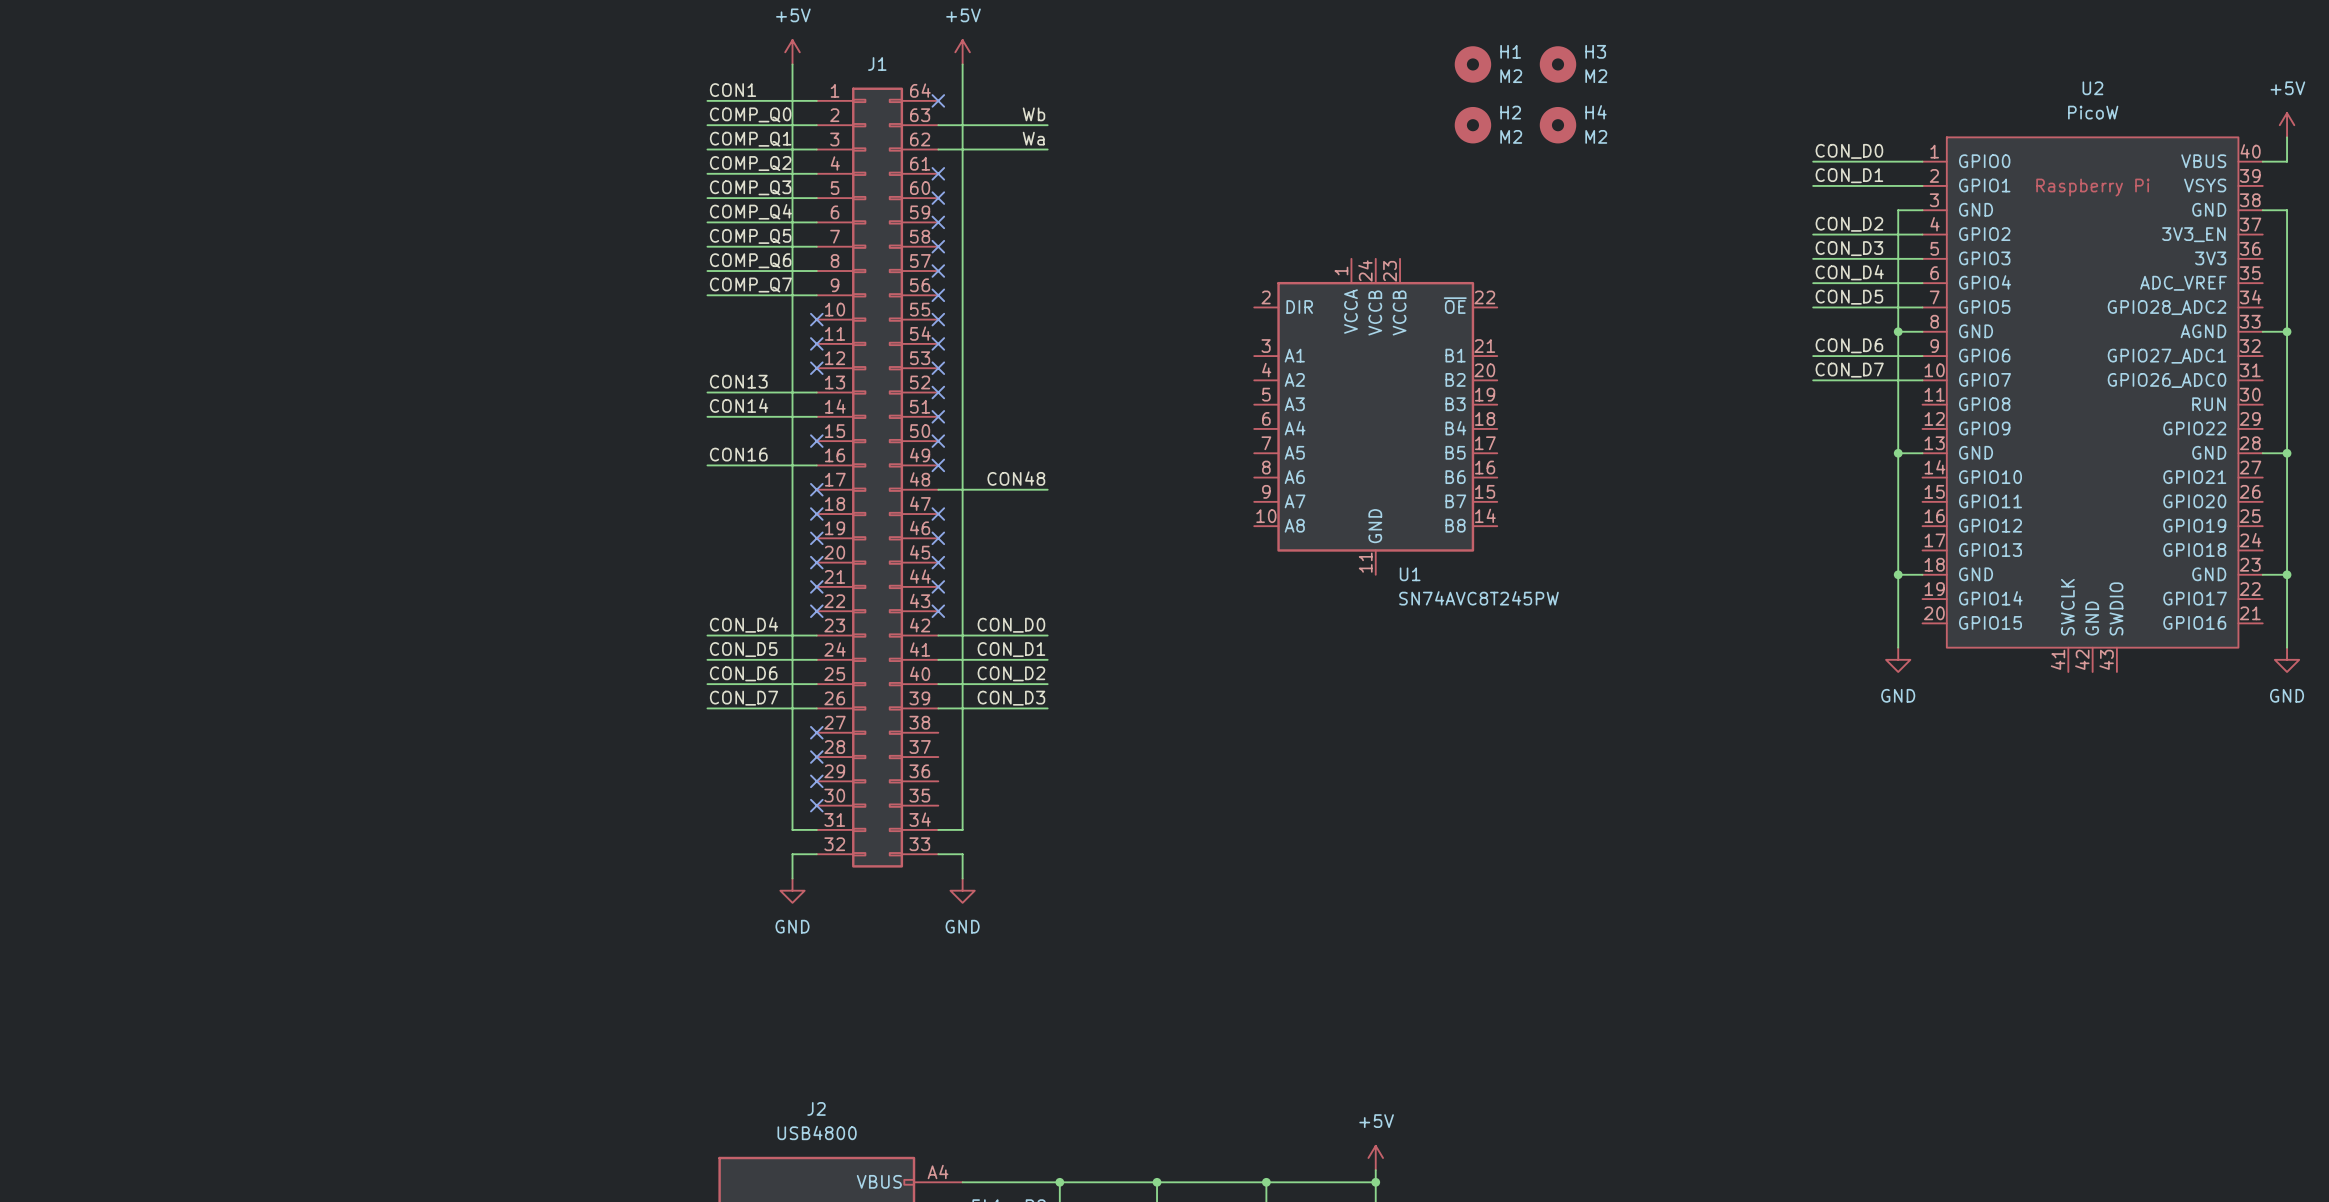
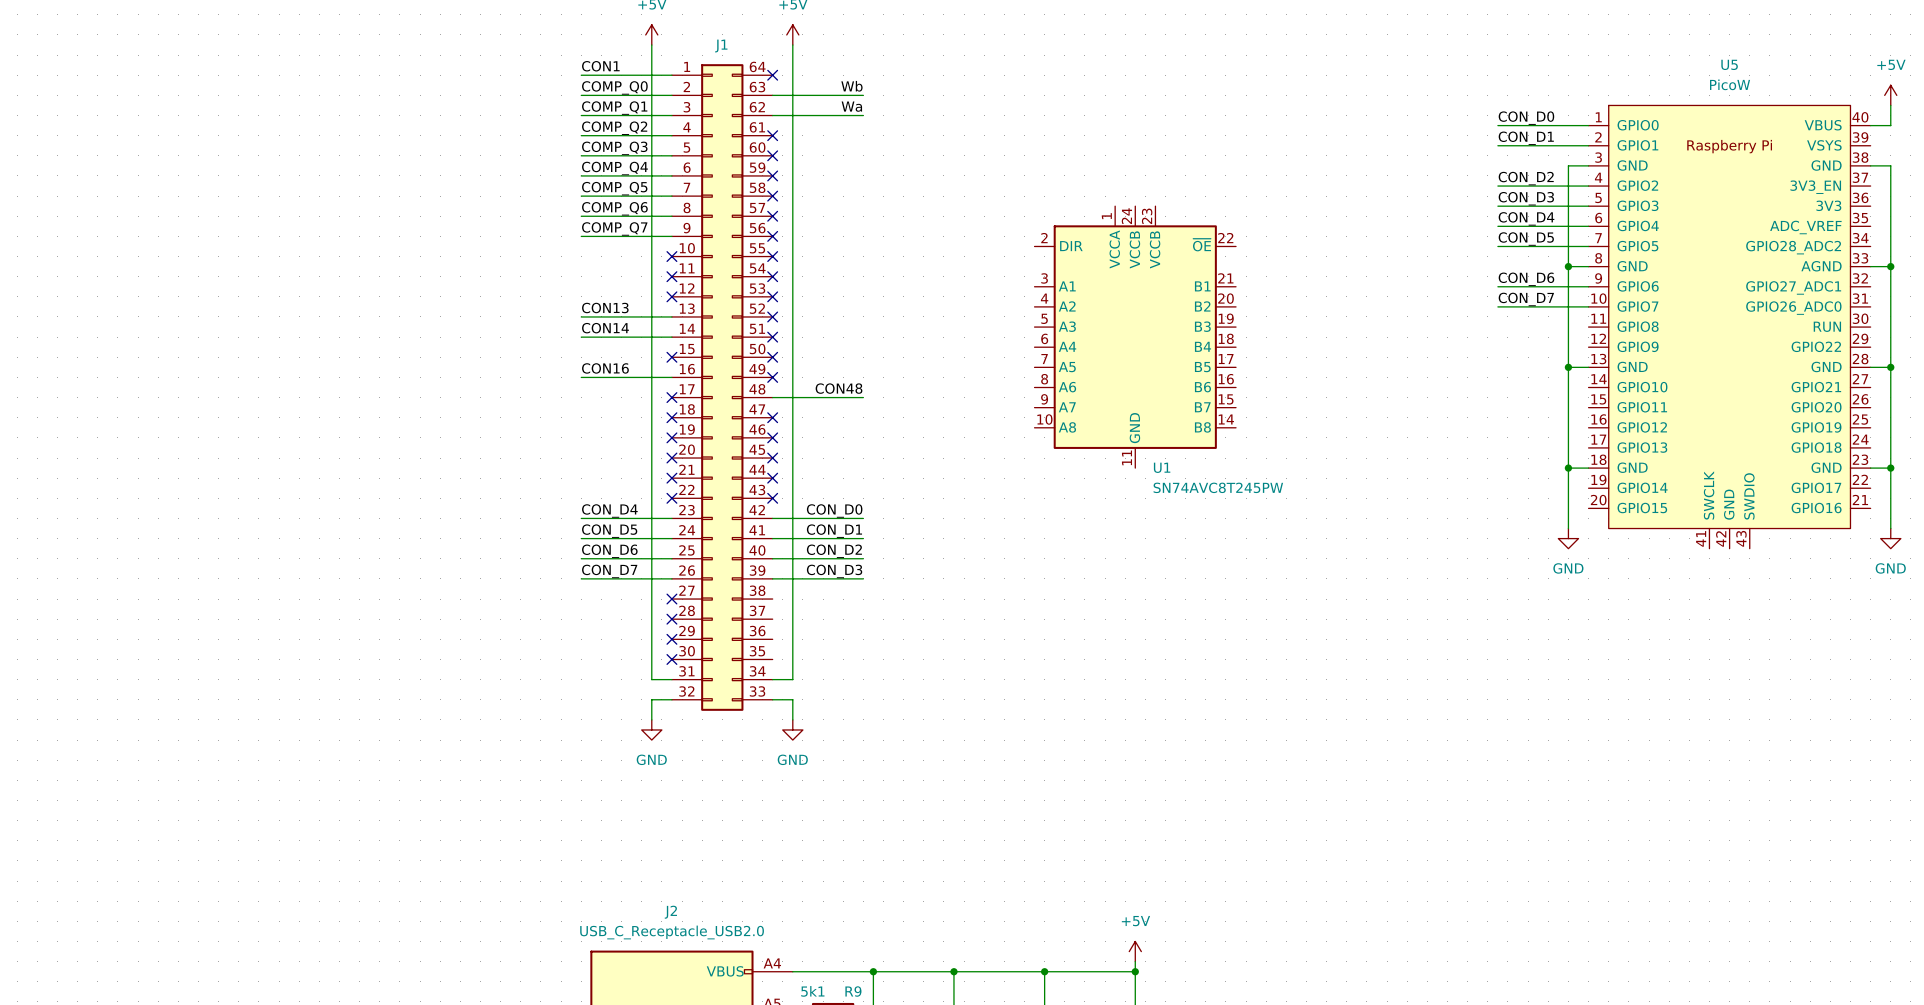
H1: M2 (1472, 64) -> none
H3: M2 (1558, 64) -> none
U2 name: U2 (2092, 88) -> U5 (1729, 64)
H2: M2 (1472, 125) -> none
H4: M2 (1558, 125) -> none
J2 value: USB4800 (817, 1132) -> USB_C_Receptacle_USB2.0 (672, 932)

